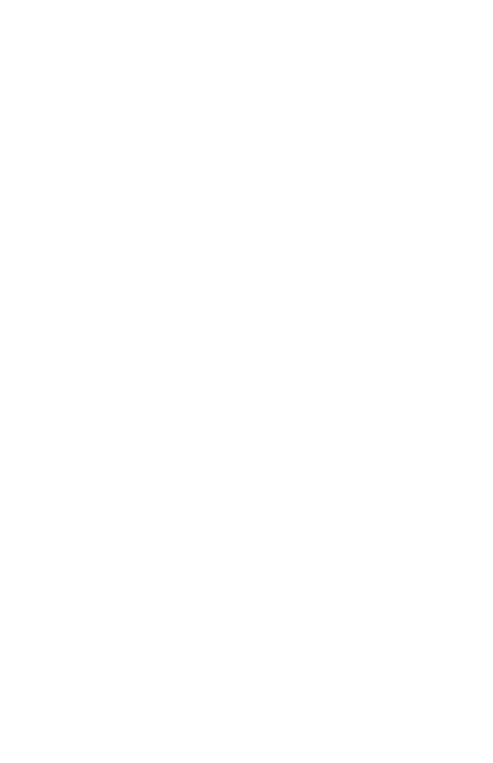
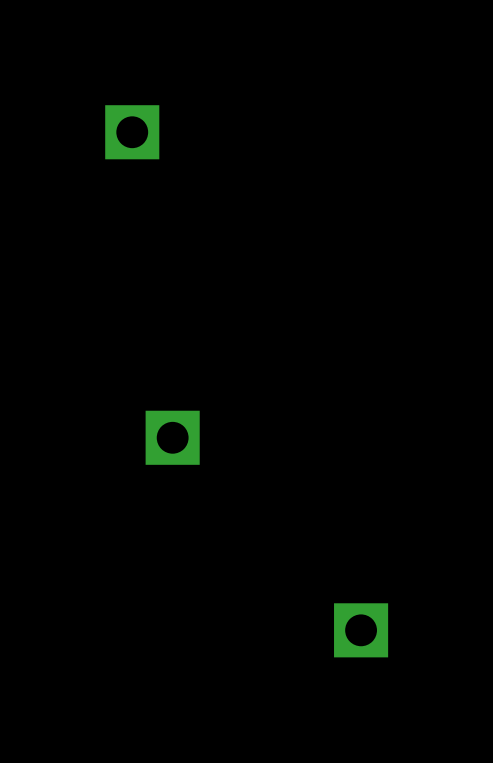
part: none -> (132, 132)
part: none -> (172, 437)
part: none -> (361, 630)

